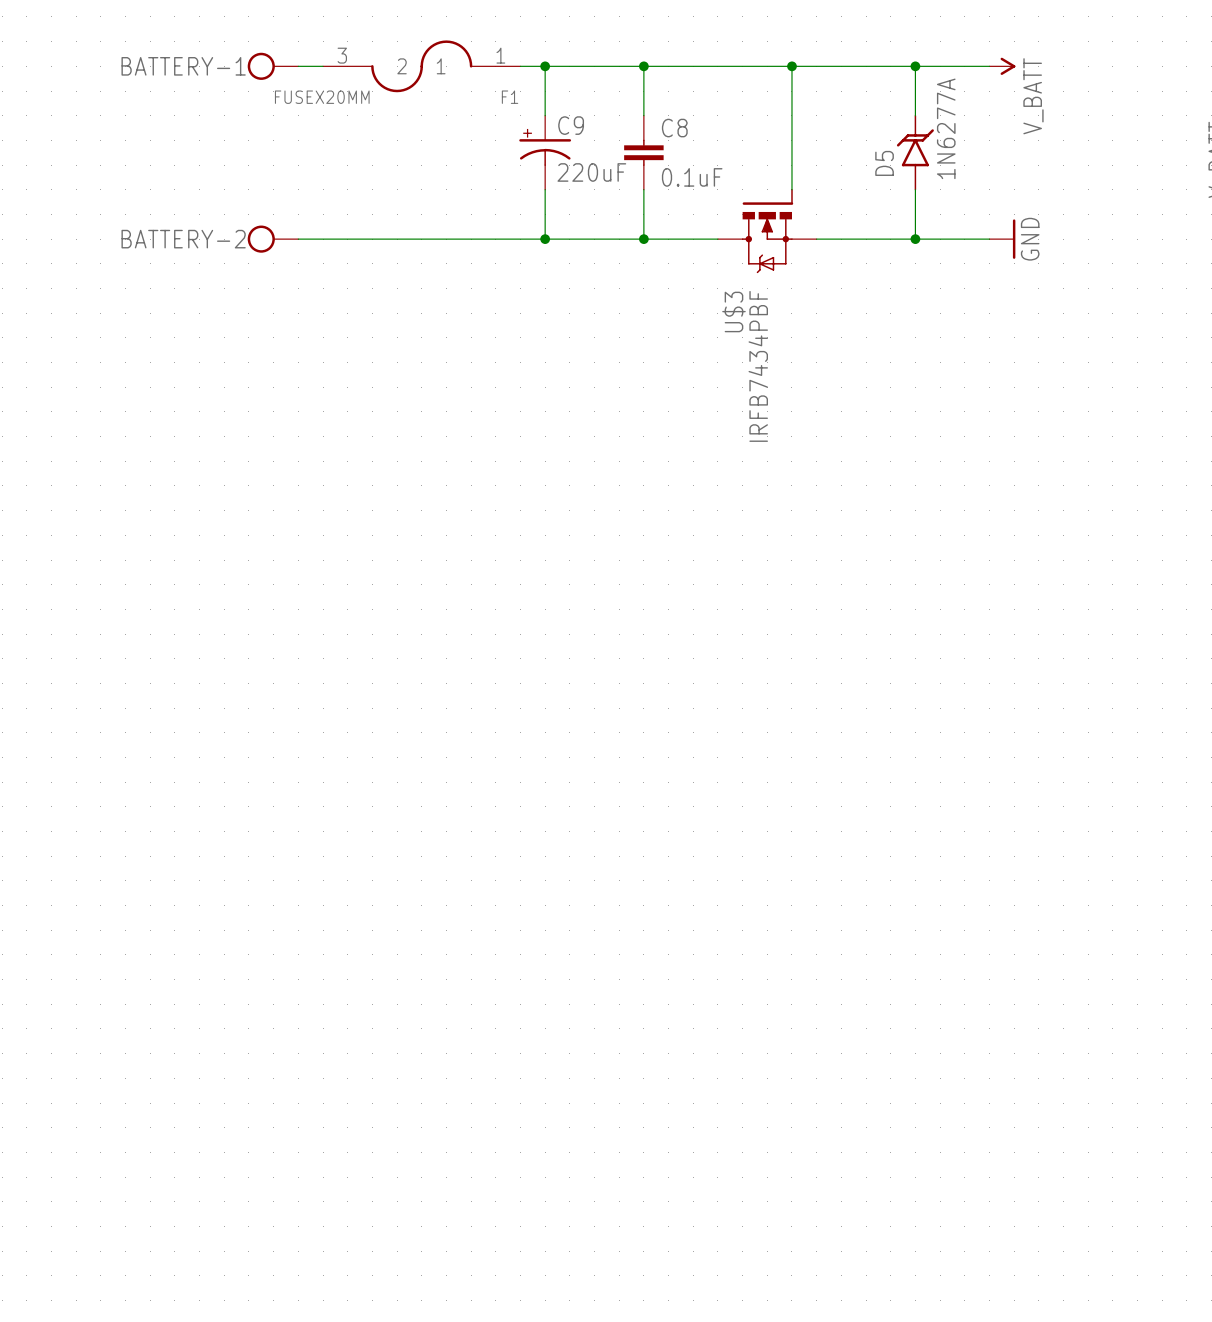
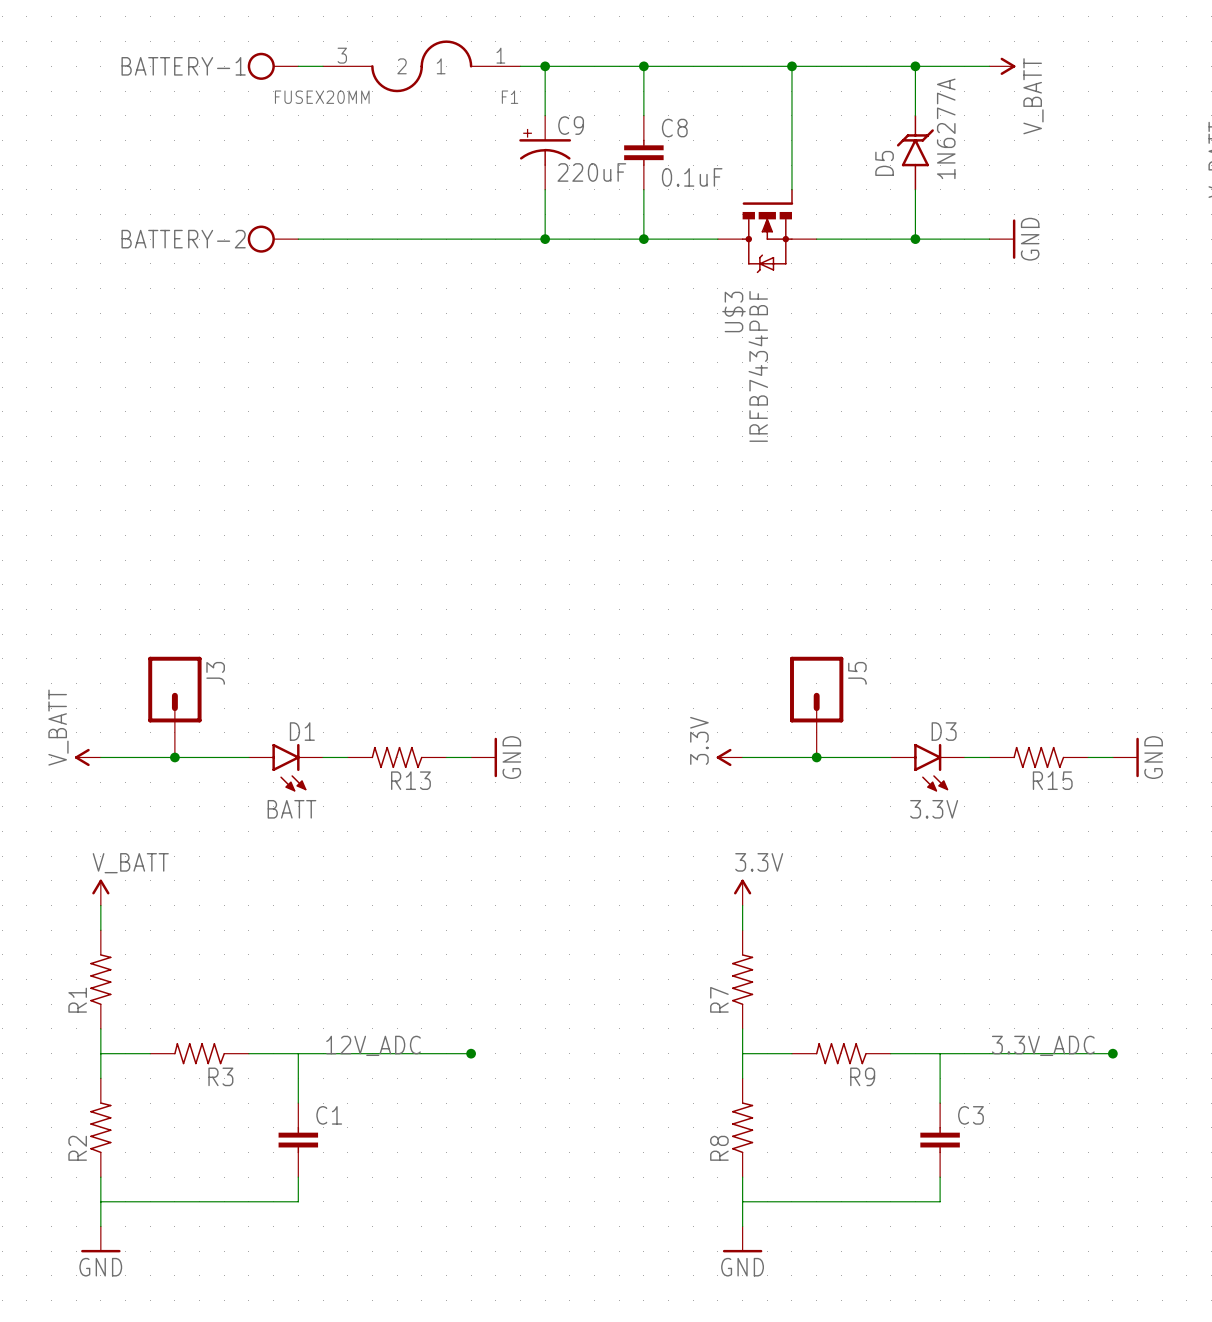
J3: none -> (174, 707)
J5: none -> (816, 707)
power symbol: none -> V_BATT (87, 757)
wire: none -> (100, 757) (248, 757)
junction: none -> (174, 757)
wire: none -> (323, 757) (347, 757)
R13: none -> (397, 757)
wire: none -> (446, 757) (471, 757)
power symbol: none -> GND (484, 757)
power symbol: none -> 3.3V (729, 757)
wire: none -> (742, 757) (890, 757)
junction: none -> (816, 757)
wire: none -> (964, 757) (989, 757)
R15: none -> (1038, 757)
wire: none -> (1088, 757) (1112, 757)
power symbol: none -> GND (1125, 757)
D1: none -> BATT (285, 767)
D3: none -> 3.3V (927, 767)
power symbol: none -> V_BATT (100, 892)
power symbol: none -> 3.3V (742, 892)
wire: none -> (100, 905) (100, 930)
wire: none -> (742, 905) (742, 930)
R1: none -> (100, 979)
R7: none -> (742, 979)
wire: none -> (100, 1028) (100, 1078)
wire: none -> (742, 1028) (742, 1078)
label: none -> 12V_ADC (373, 1045)
label: none -> 3.3V_ADC (1043, 1045)
wire: none -> (100, 1053) (150, 1053)
R3: none -> (199, 1053)
wire: none -> (248, 1053) (471, 1053)
wire: none -> (298, 1053) (298, 1103)
junction: none -> (471, 1053)
wire: none -> (742, 1053) (791, 1053)
R9: none -> (841, 1053)
wire: none -> (890, 1053) (1112, 1053)
wire: none -> (940, 1053) (940, 1103)
junction: none -> (1112, 1053)
R2: none -> (100, 1127)
R8: none -> (742, 1127)
C1: none -> (298, 1140)
C3: none -> (940, 1140)
wire: none -> (100, 1177) (100, 1226)
wire: none -> (298, 1177) (298, 1201) (100, 1201)
wire: none -> (742, 1177) (742, 1226)
wire: none -> (940, 1177) (940, 1201) (742, 1201)
power symbol: none -> GND (100, 1239)
power symbol: none -> GND (742, 1239)

